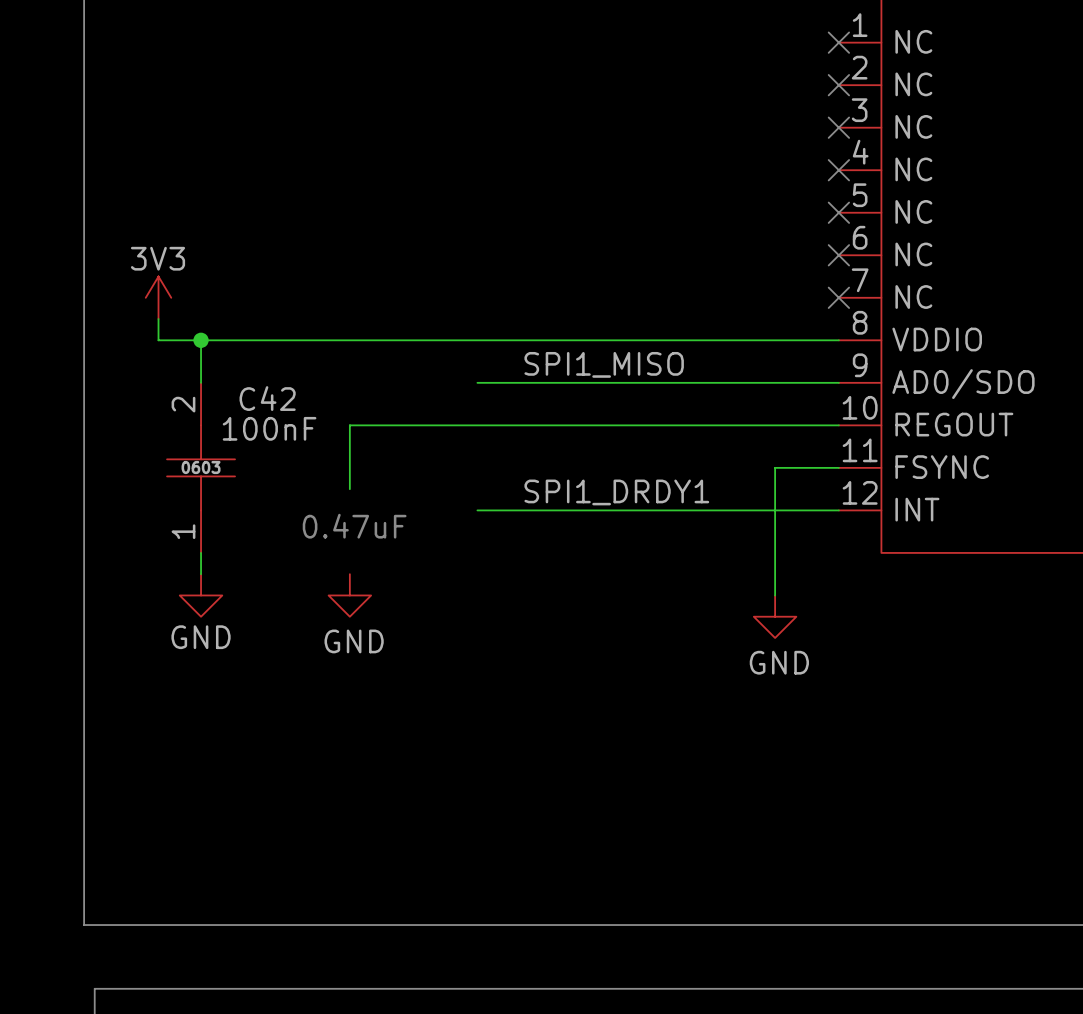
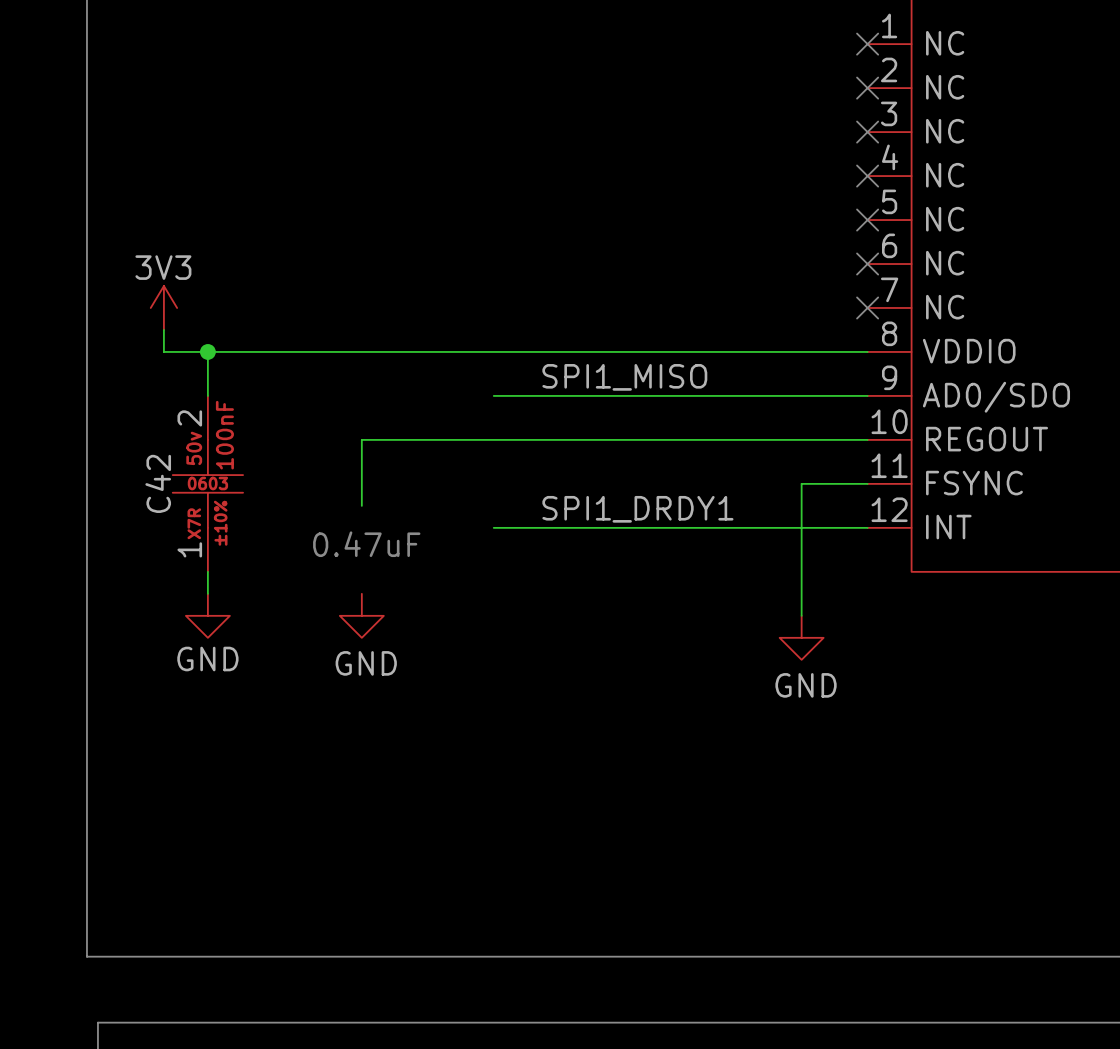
C42 name rotation: 0° (267, 398) -> 90° counterclockwise (158, 483)
C42 name position: C42 (267, 398) -> C42 (158, 483)
C42 text: none -> 100nF (224, 435)
C42 text: 100nF (269, 428) -> none
C42 text: none -> 50v (194, 448)
C42 text: none -> 0603 (207, 483)
C42 text: 0603 (201, 467) -> none
C42 text: none -> ±10% (220, 523)
C42 text: none -> X7R (194, 523)

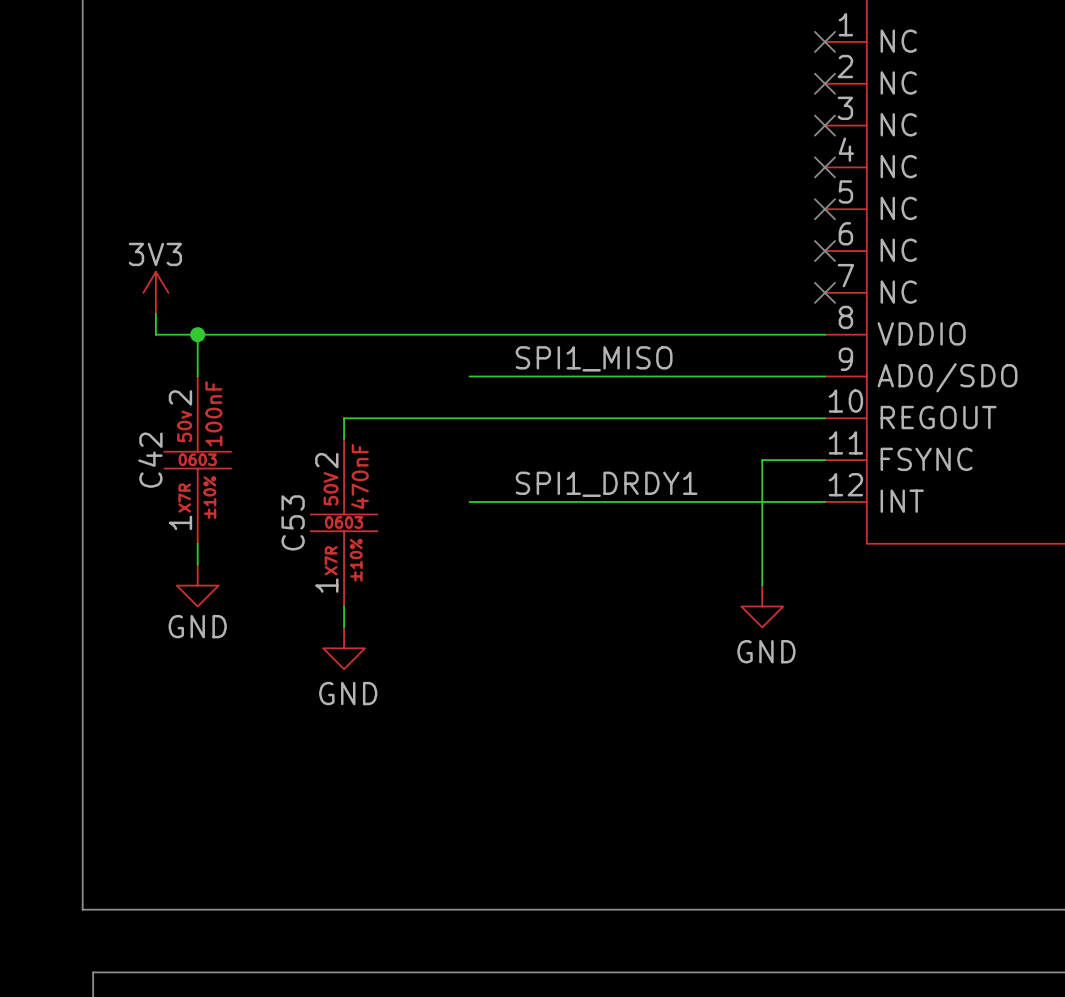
text: 0.47uF (366, 544) -> none
C53: none -> (344, 522)
power symbol position: GND (361, 615) -> GND (344, 648)
wire: none -> (344, 606) (344, 627)

